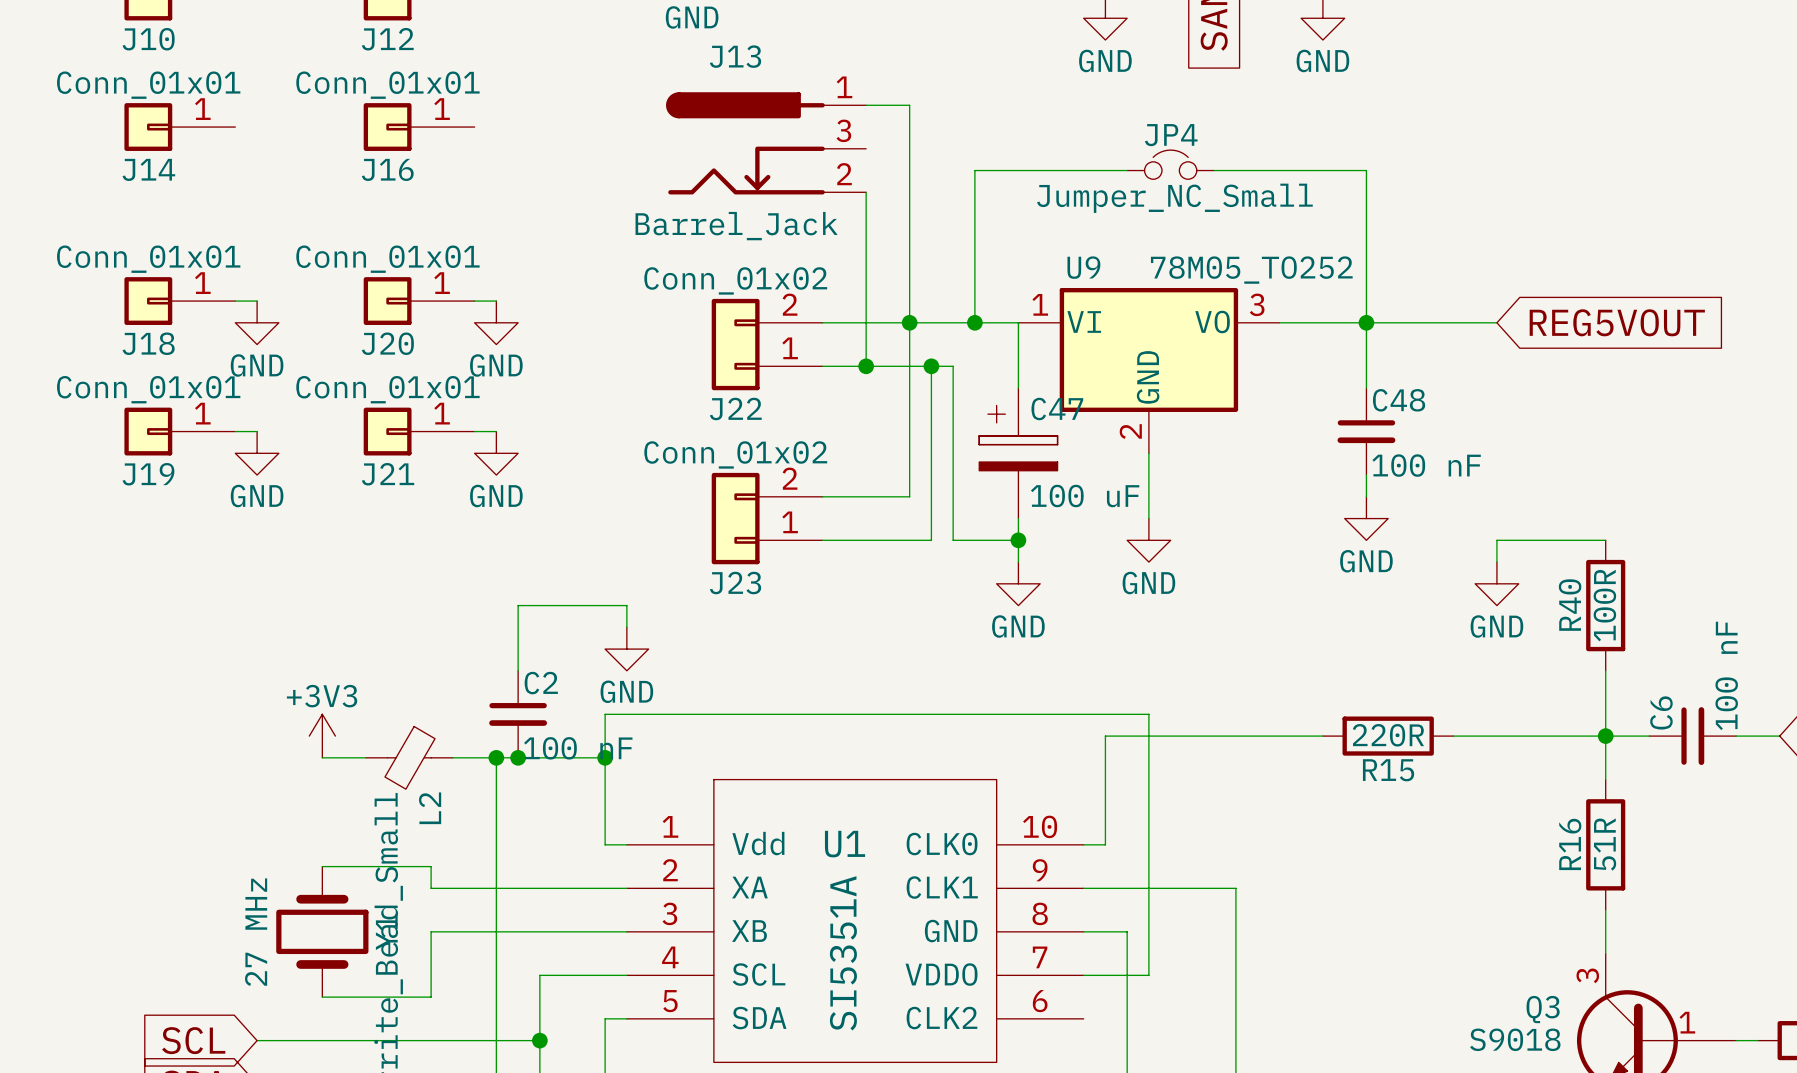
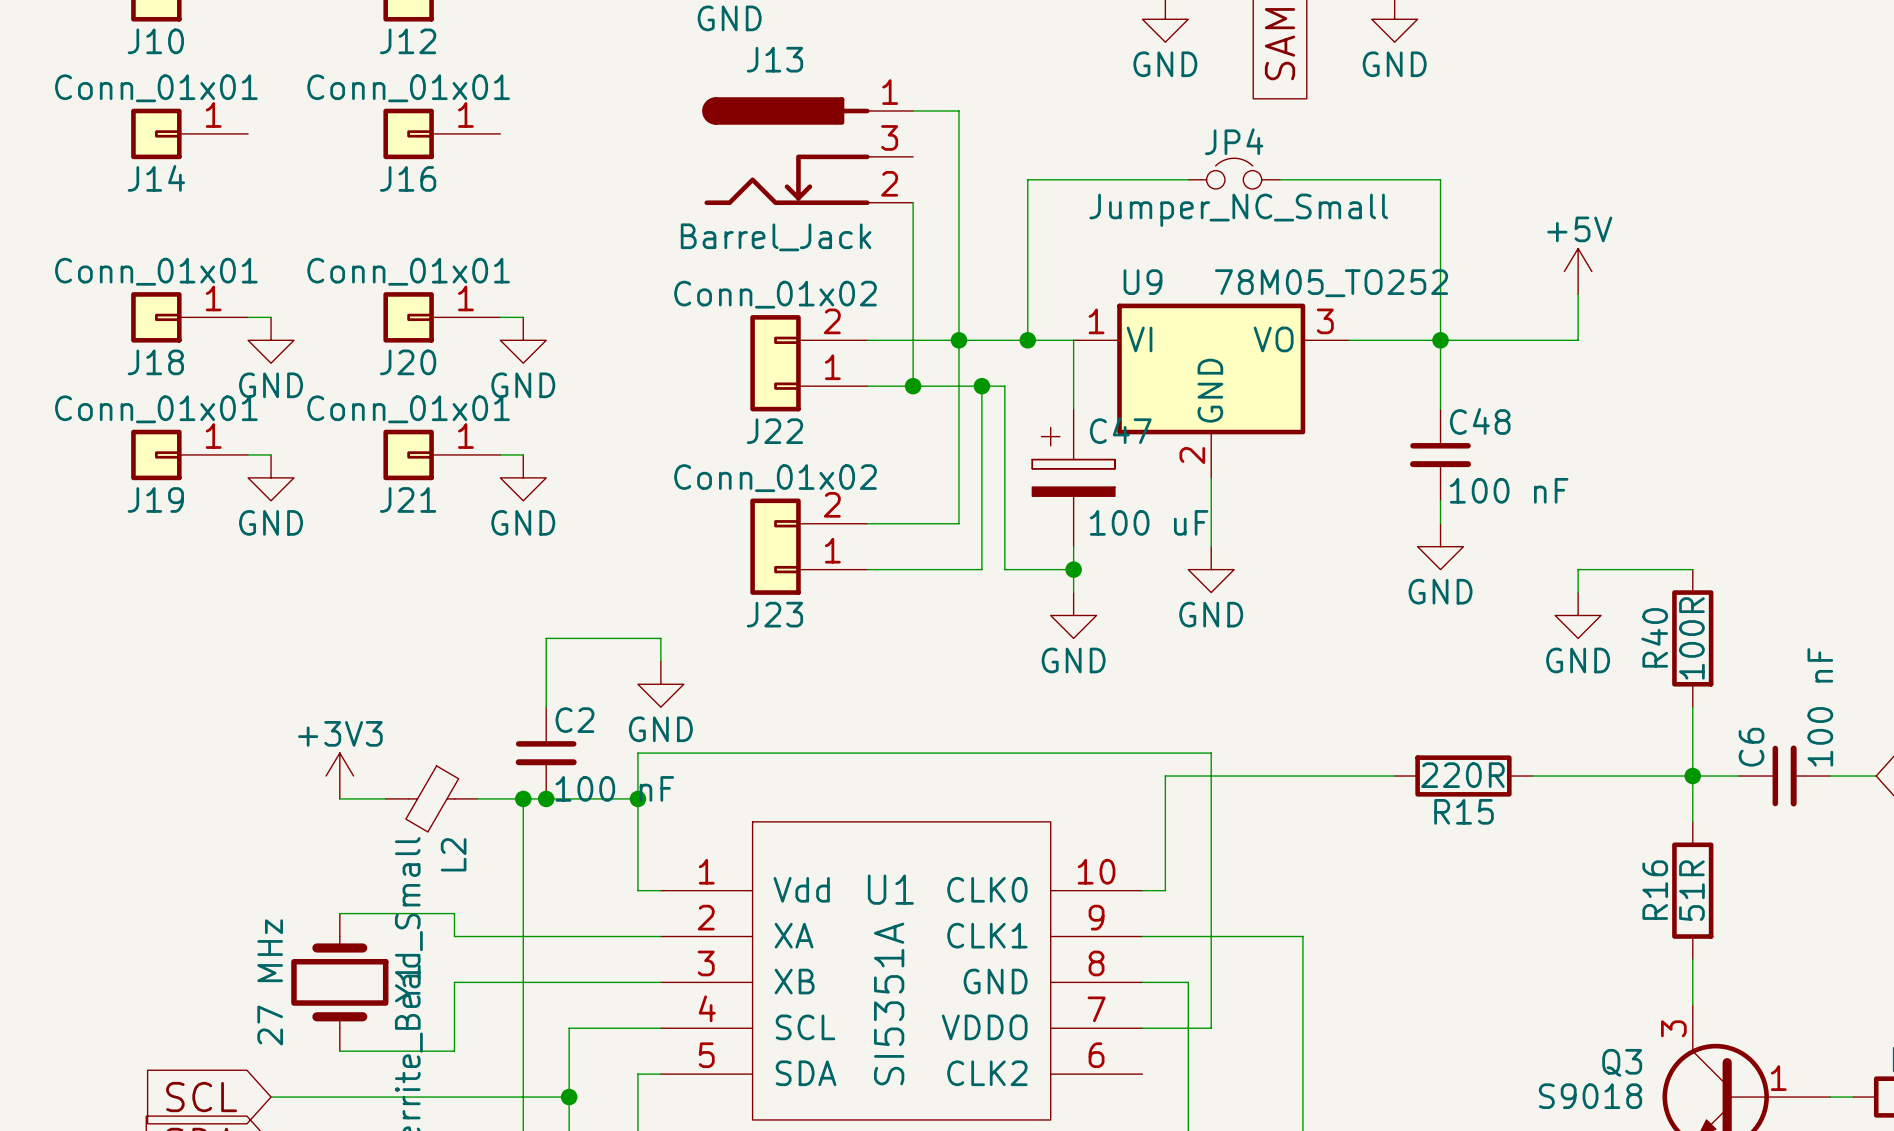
power symbol: none -> +5V (1578, 271)
wire: none -> (1578, 294) (1578, 340)
global label: REG5VOUT (1617, 322) -> none

